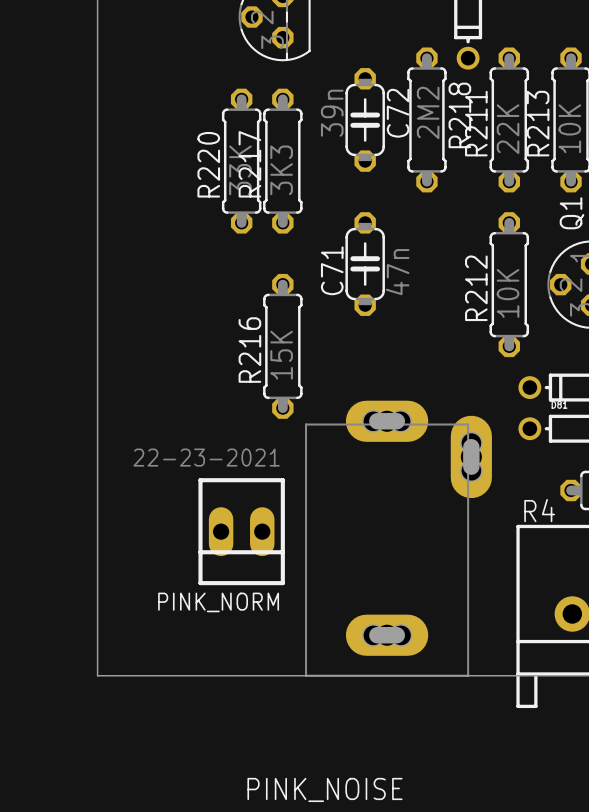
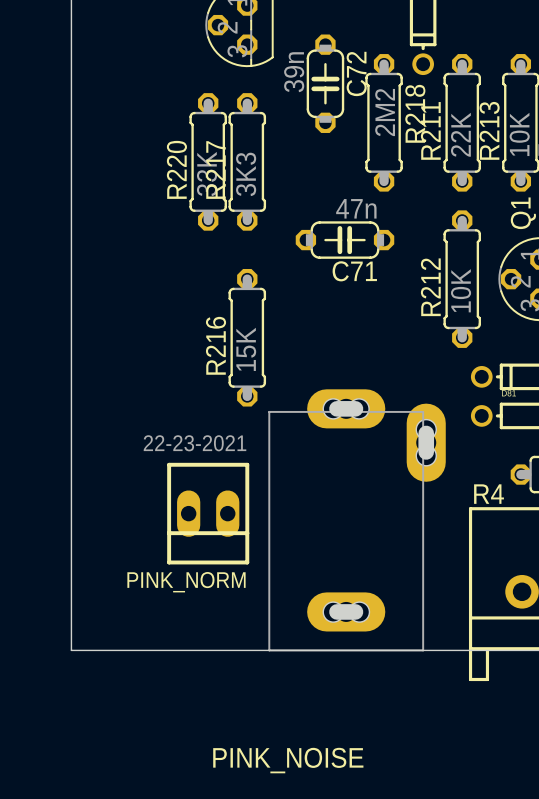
C72 position: (365, 119) -> (325, 83)
C71 rotation: 0° (365, 264) -> 90° counterclockwise (344, 240)

